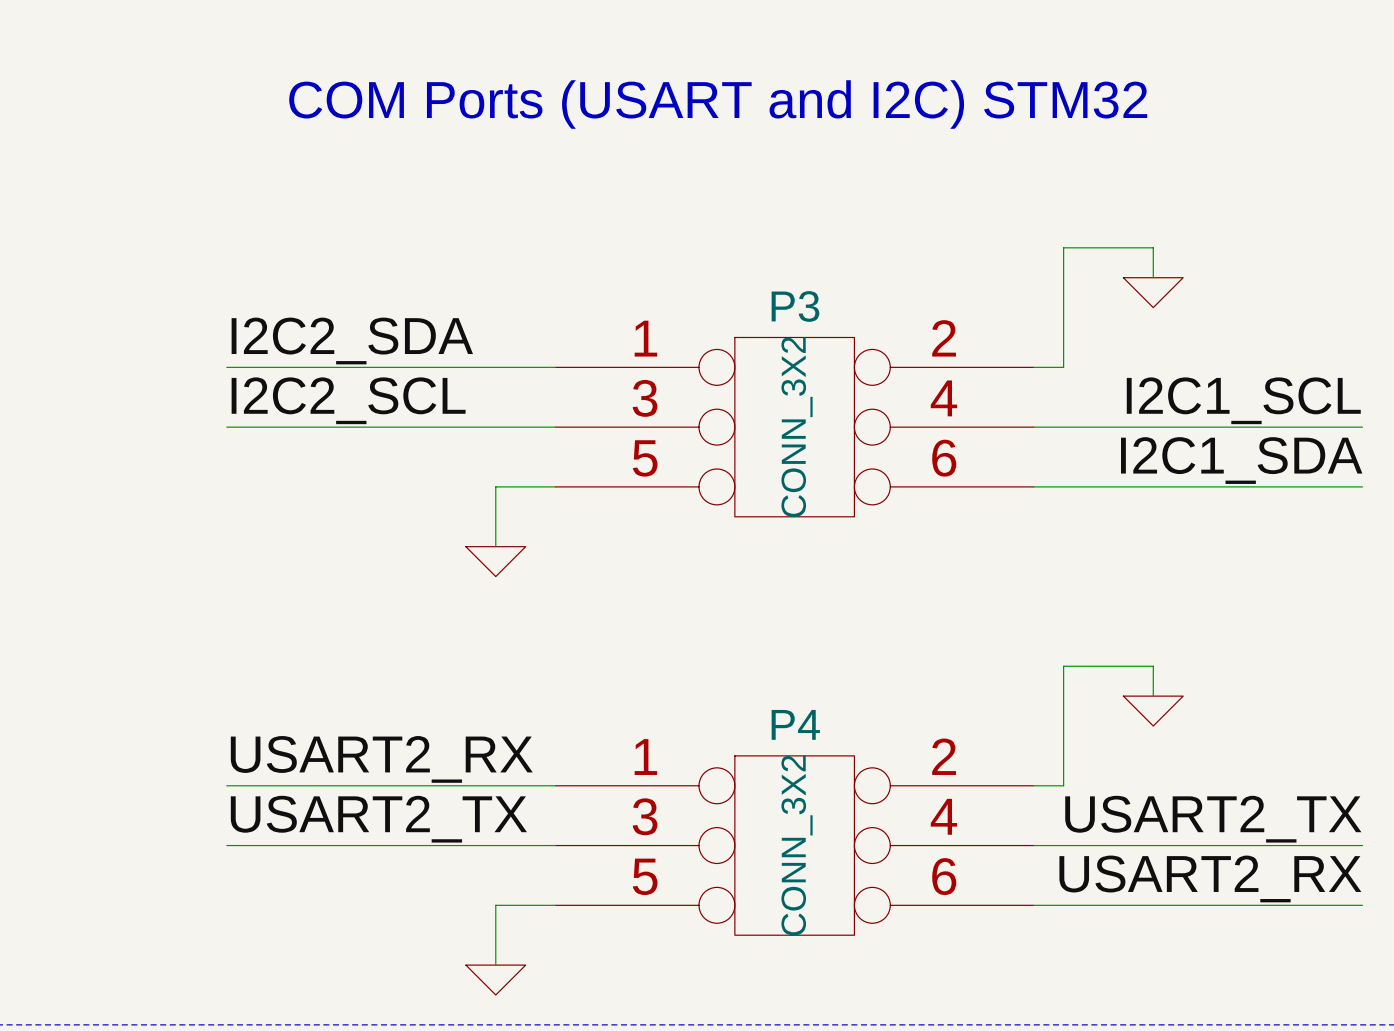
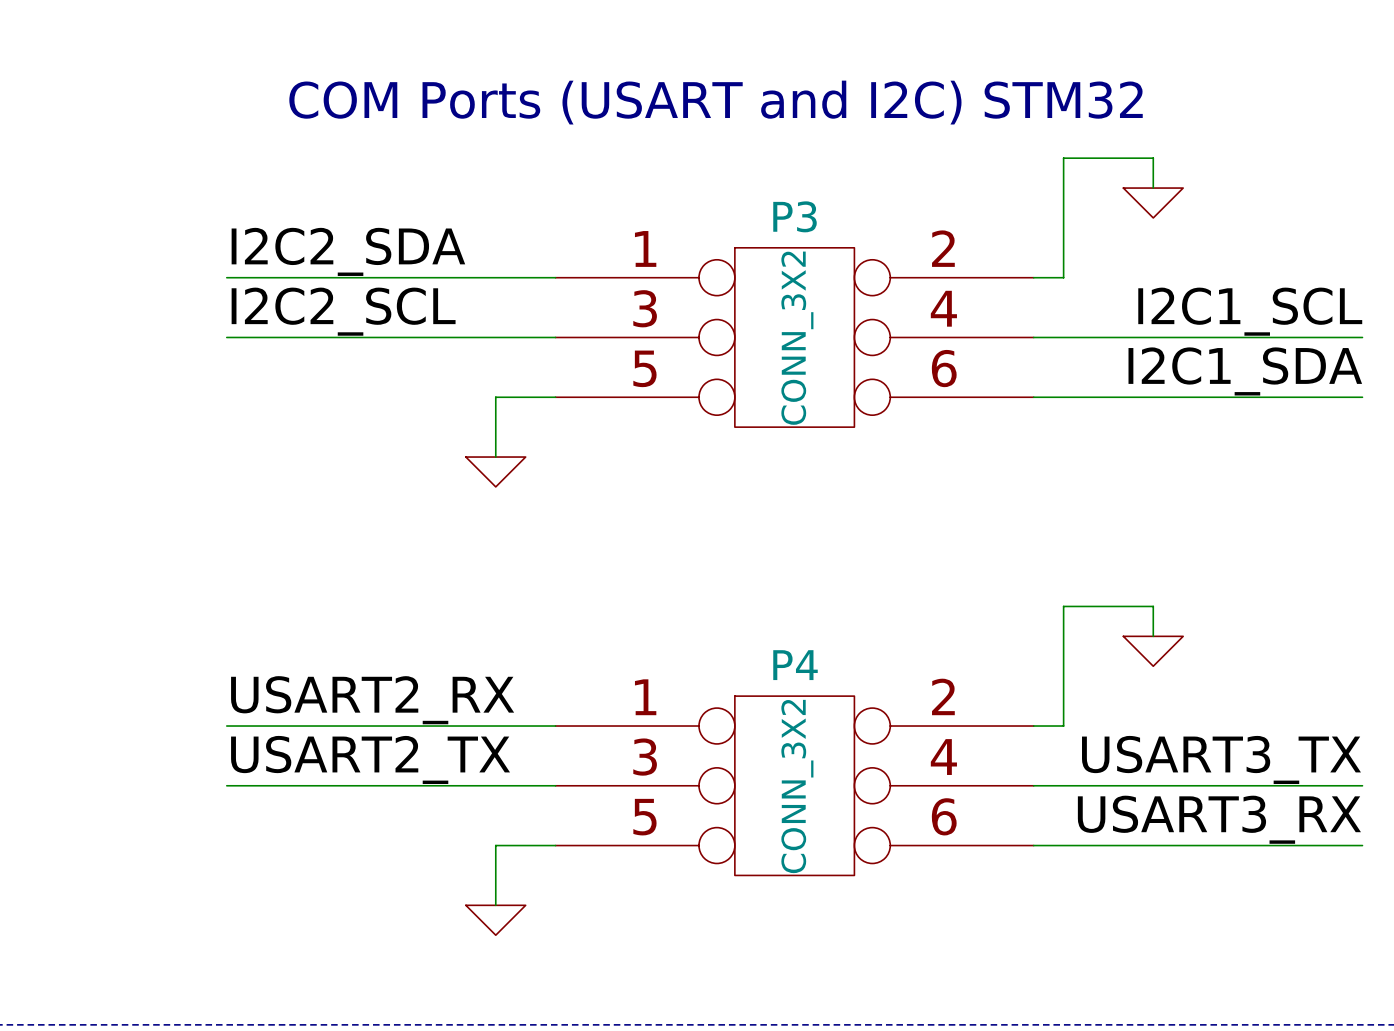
wire: (1063, 247) (1153, 247) (1153, 277) -> (1063, 247) (1063, 158) (1153, 158) (1153, 188)
wire: (1063, 277) (1063, 367) (1033, 367) -> (1063, 277) (1033, 277)
power symbol position: (1153, 292) -> (1153, 202)
label position: I2C2_SDA (352, 340) -> I2C2_SDA (348, 251)
wire: (226, 367) (555, 367) -> (226, 277) (555, 277)
label position: I2C2_SCL (348, 400) -> I2C2_SCL (343, 311)
label position: I2C1_SCL (1243, 400) -> I2C1_SCL (1250, 311)
wire: (226, 427) (555, 427) -> (226, 337) (555, 337)
P3 position: (794, 427) -> (794, 337)
wire: (1033, 427) (1362, 427) -> (1033, 337) (1362, 337)
label position: I2C1_SDA (1241, 460) -> I2C1_SDA (1245, 371)
wire: (555, 486) (495, 486) (495, 546) -> (555, 397) (495, 397) (495, 457)
wire: (1033, 486) (1362, 486) -> (1033, 397) (1362, 397)
power symbol position: (495, 561) -> (495, 471)
wire: (1063, 666) (1153, 666) (1153, 696) -> (1063, 666) (1063, 606) (1153, 606) (1153, 636)
label: none -> USART2_RX (372, 700)
power symbol position: (1153, 711) -> (1153, 651)
wire: none -> (226, 726) (555, 726)
wire: (1063, 726) (1063, 785) -> (1063, 726) (1033, 726)
label: USART2_RX (381, 759) -> USART2_TX (370, 759)
label: none -> USART3_TX (1221, 759)
wire: none -> (1063, 785) (1362, 785)
label: USART2_TX (378, 819) -> none
label: USART2_TX (1213, 819) -> USART3_RX (1219, 819)
wire: (226, 845) (495, 845) -> (495, 905) (495, 845)
P4 position: (794, 845) -> (794, 785)
label: USART2_RX (1210, 878) -> none
wire: (555, 905) (495, 905) (495, 965) -> none
wire: (1033, 905) (1362, 905) -> none
power symbol position: (495, 980) -> (495, 920)

